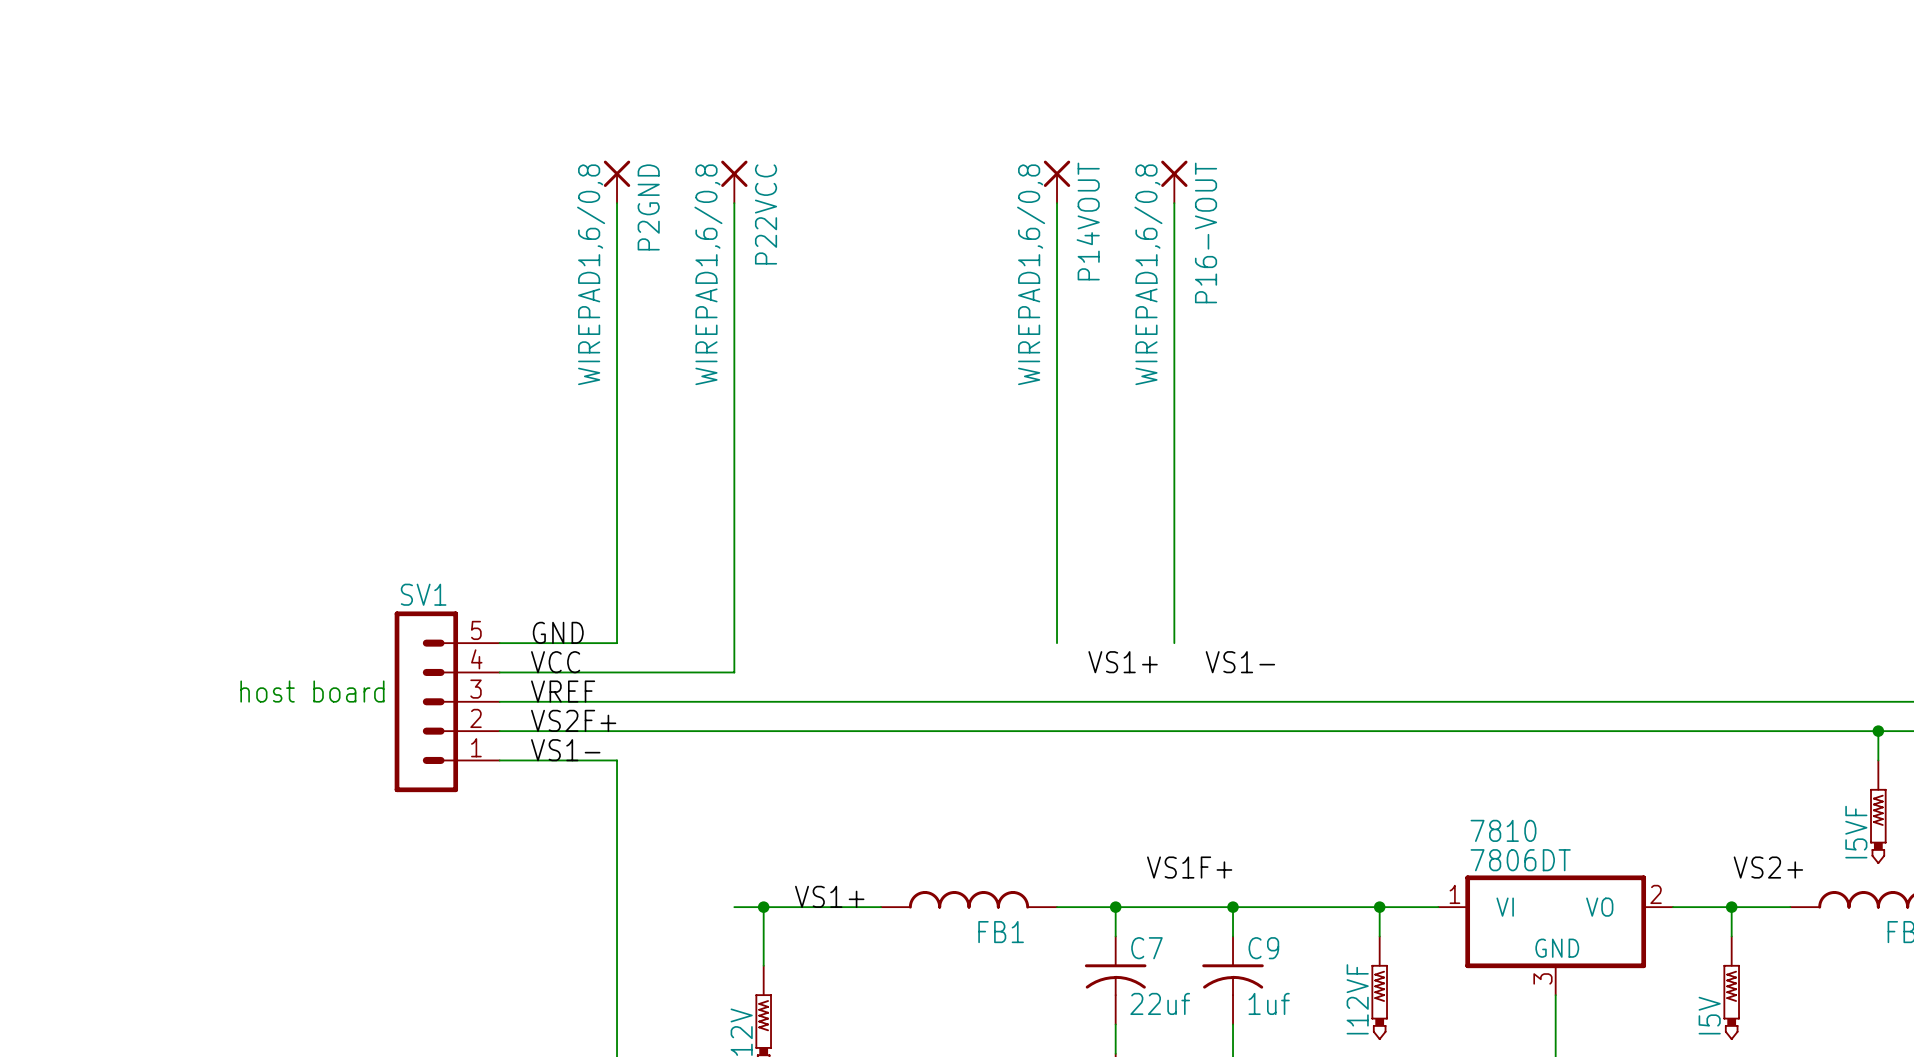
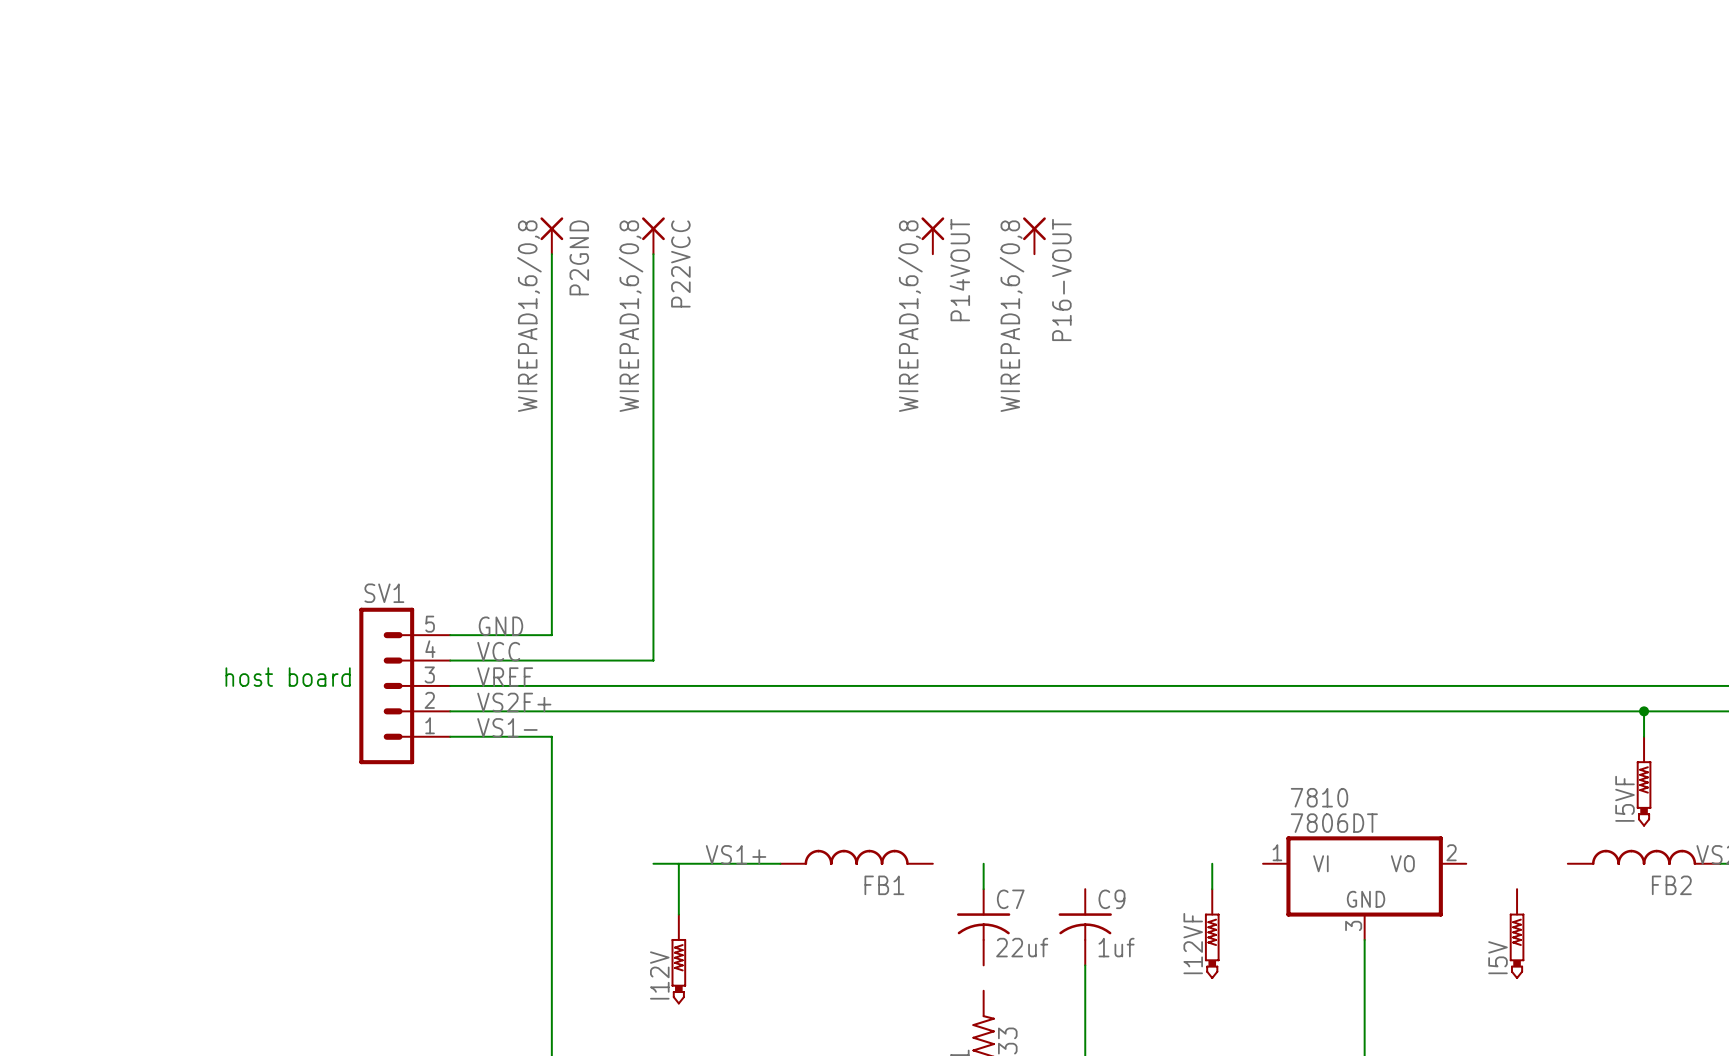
wire: (1057, 203) (1057, 643) -> none
wire: (1174, 203) (1174, 643) -> none
label: VS1+ (1123, 662) -> none
label: VS1- (1240, 662) -> none
label: VS1F+ (1189, 867) -> none
label: VS2+ (1768, 867) -> none
junction: (763, 907) -> none
wire: (1057, 907) (1438, 907) -> none
junction: (1115, 907) -> none
wire: (1233, 907) (1233, 936) -> none
junction: (1233, 907) -> none
junction: (1379, 907) -> none
wire: (1673, 907) (1790, 907) -> none
wire: (1731, 907) (1731, 936) -> none
junction: (1731, 907) -> none
wire: (1115, 1024) (1115, 1053) -> none

